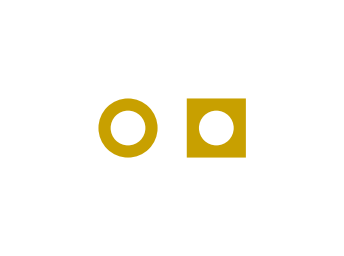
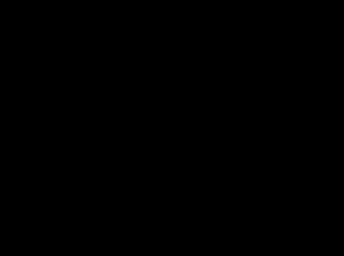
part: (172, 128) -> none

